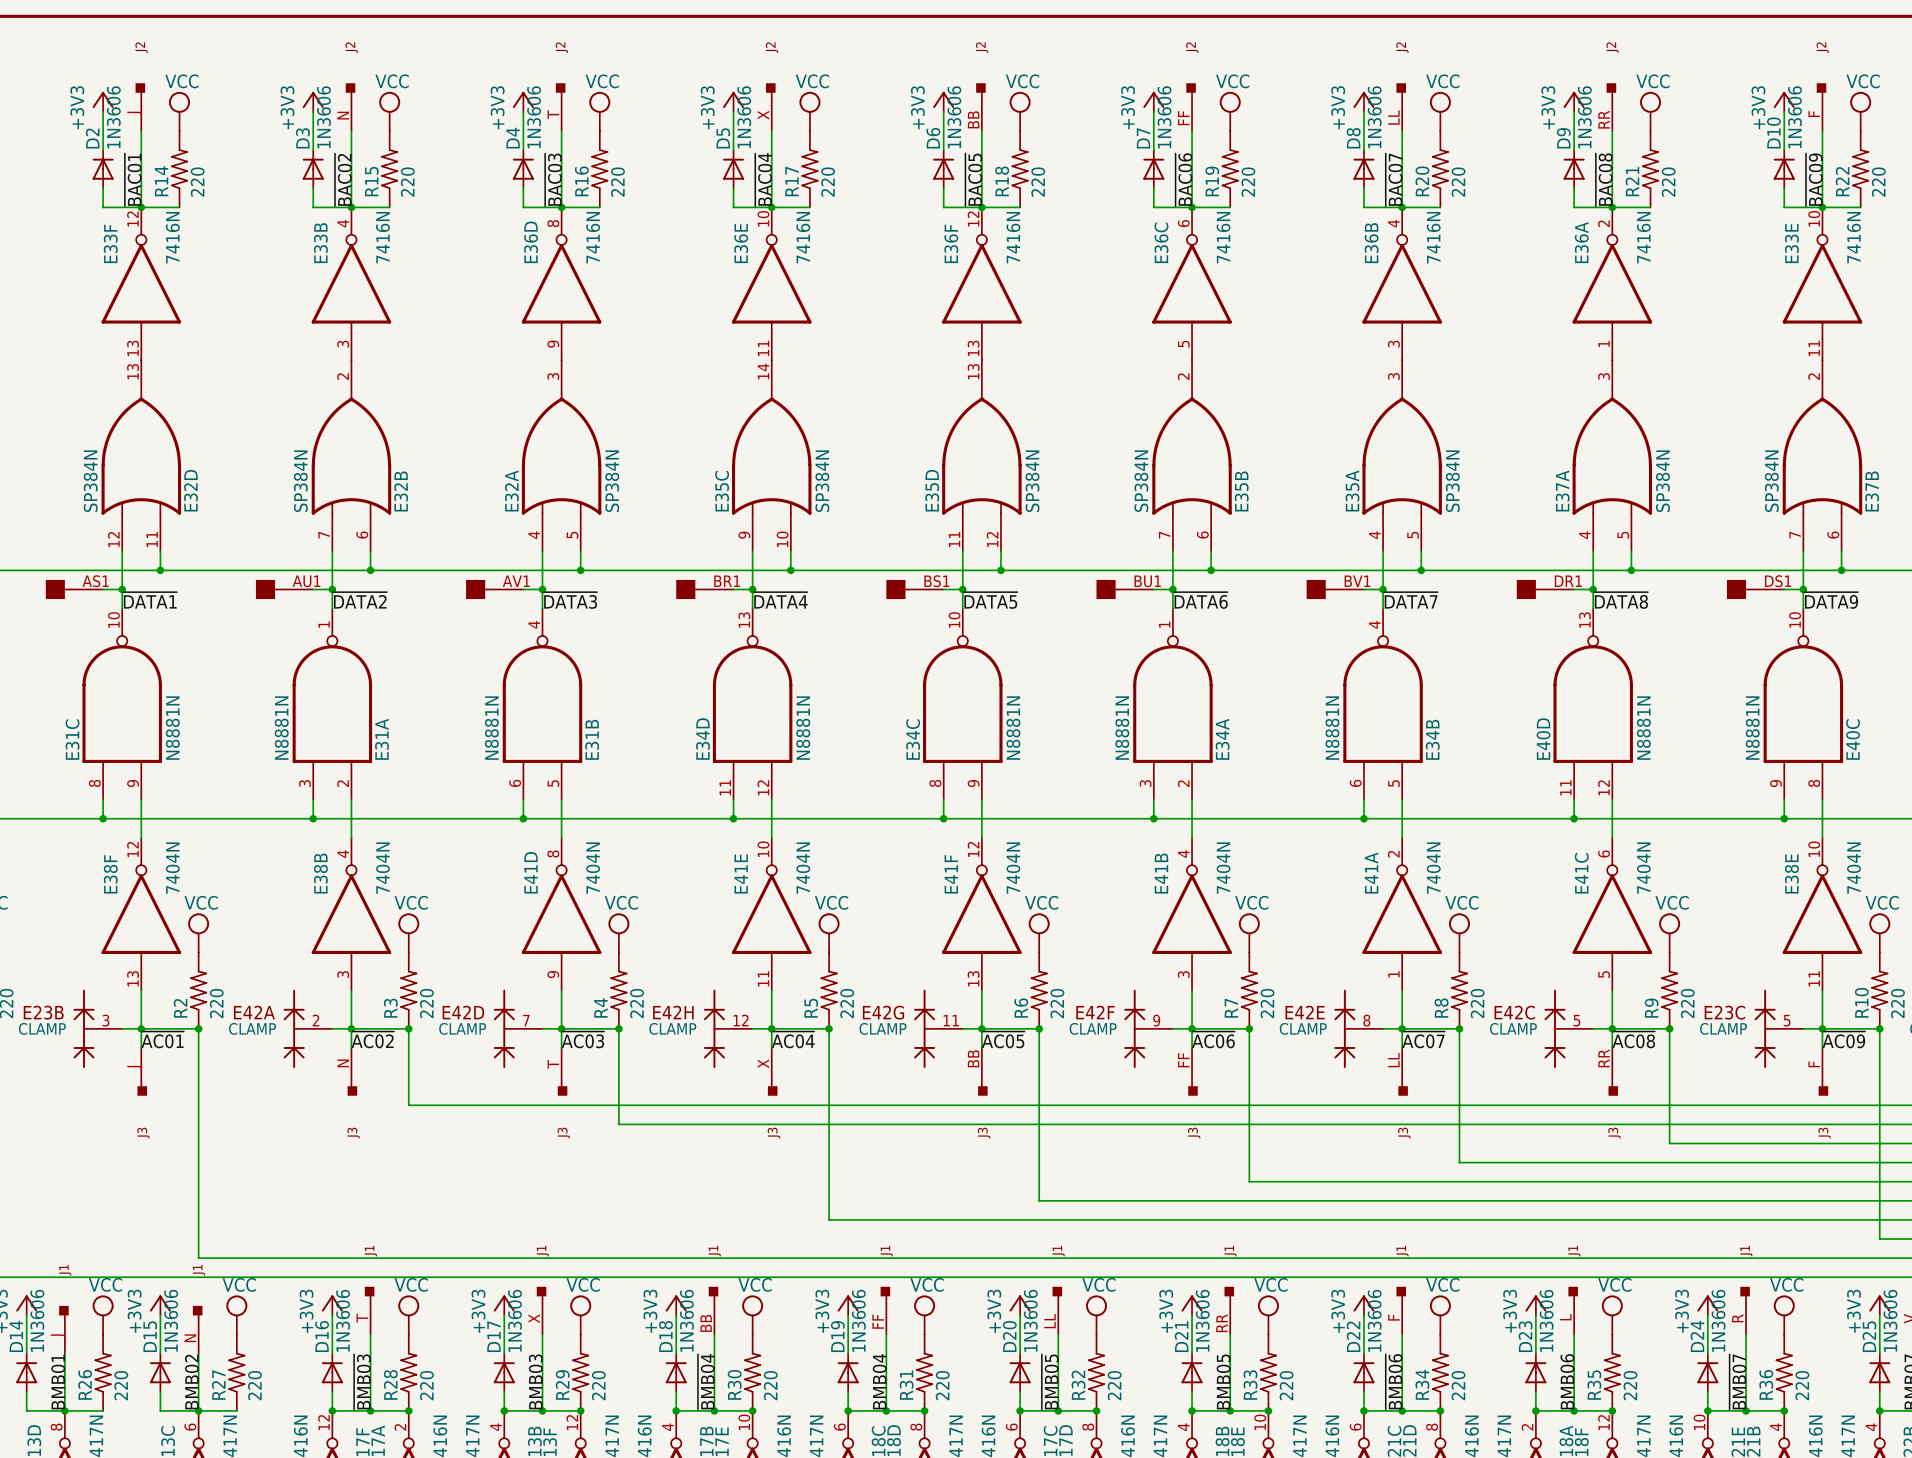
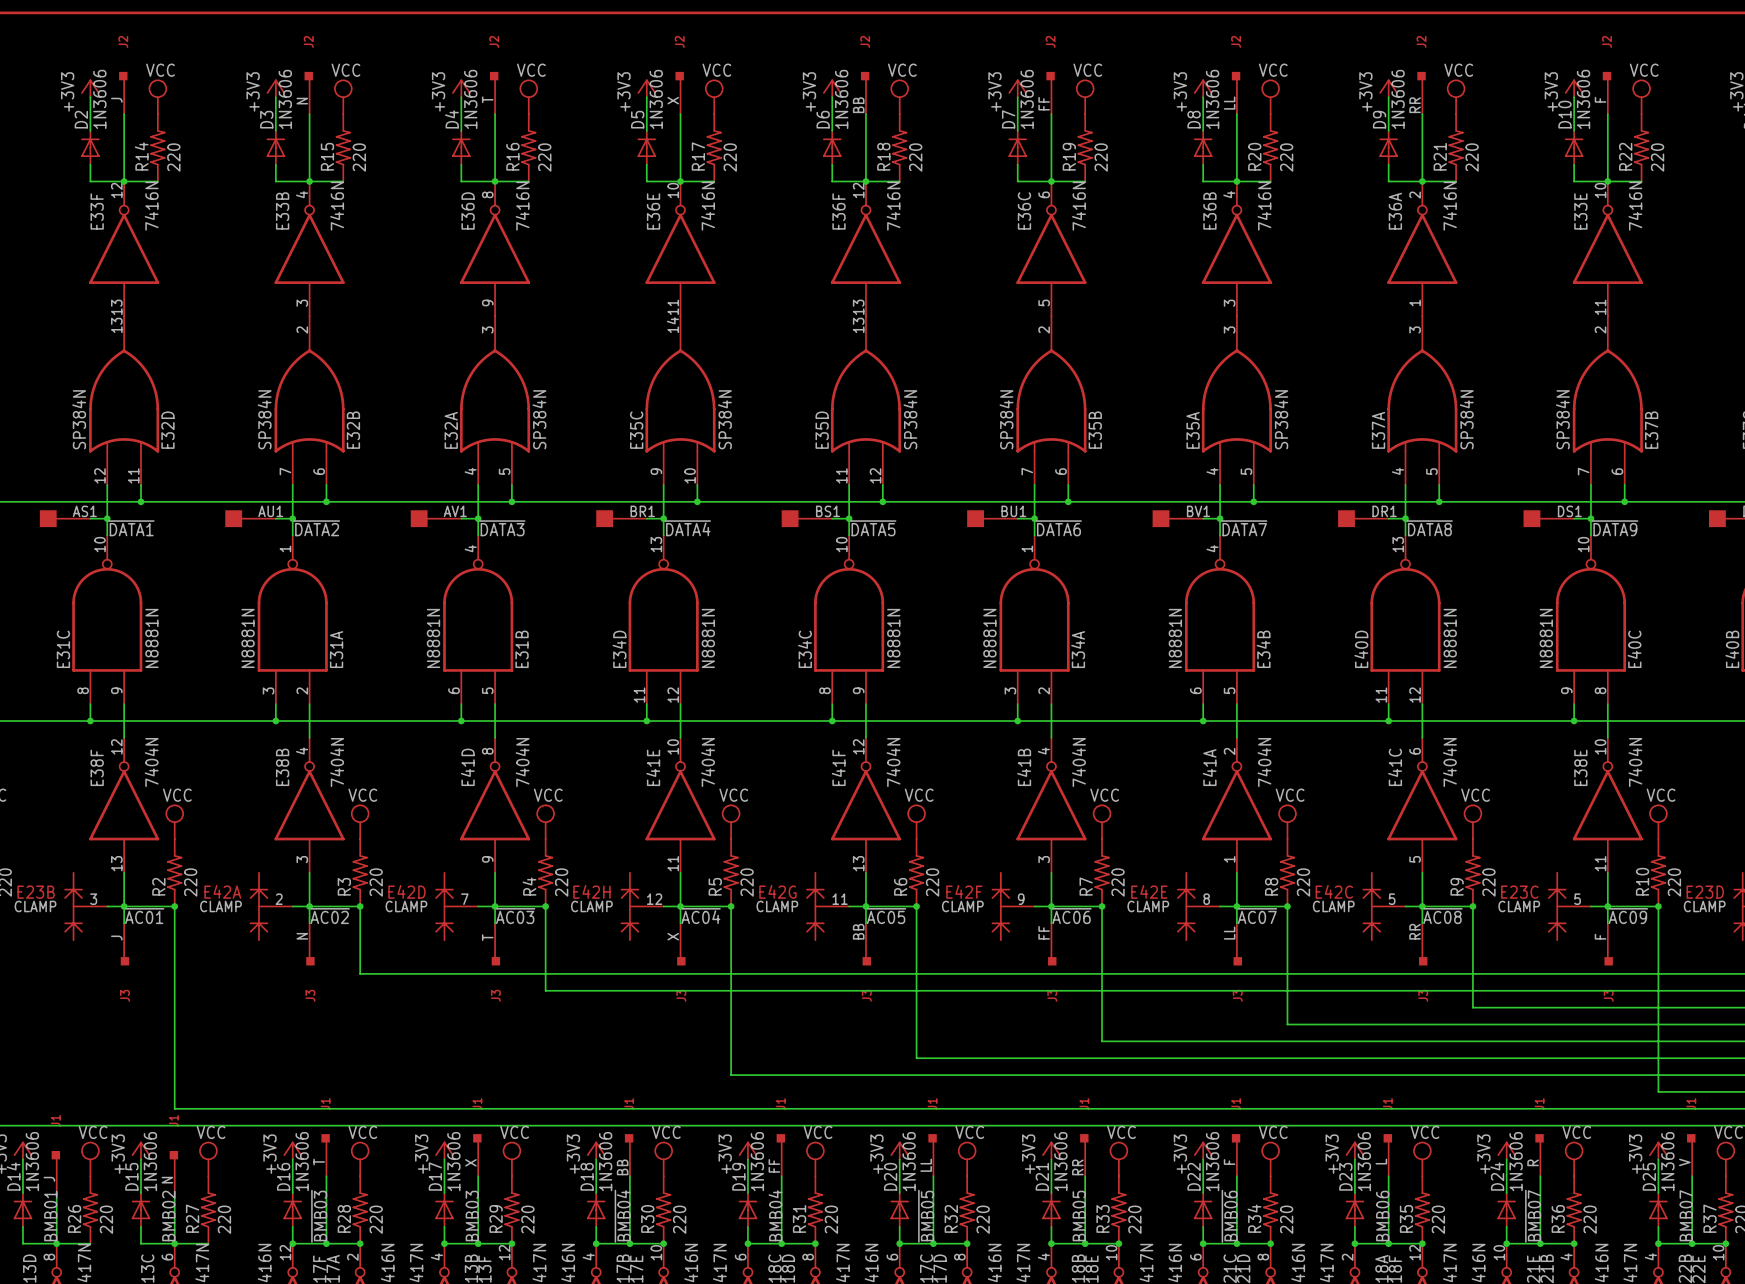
label: ~{BAC01} (133, 179) -> none
label: ~{BAC02} (343, 179) -> none
label: ~{BAC03} (553, 179) -> none
label: ~{BAC04} (763, 179) -> none
label: ~{BAC05} (973, 179) -> none
label: ~{BAC06} (1183, 179) -> none
label: ~{BAC07} (1394, 179) -> none
label: ~{BAC08} (1604, 179) -> none
label: ~{BAC09} (1814, 179) -> none

